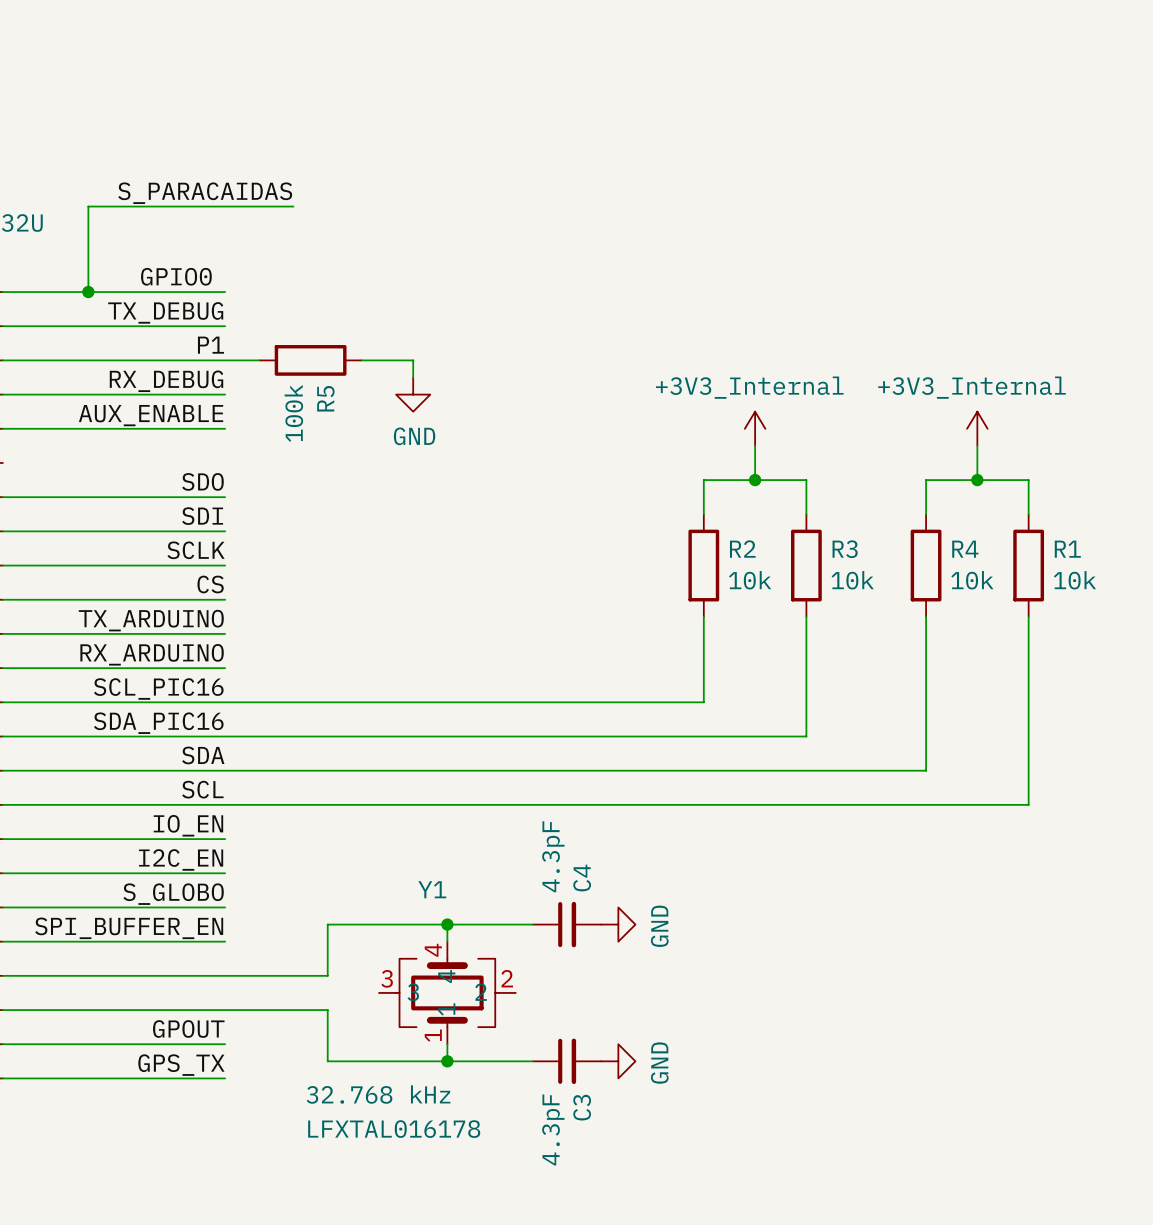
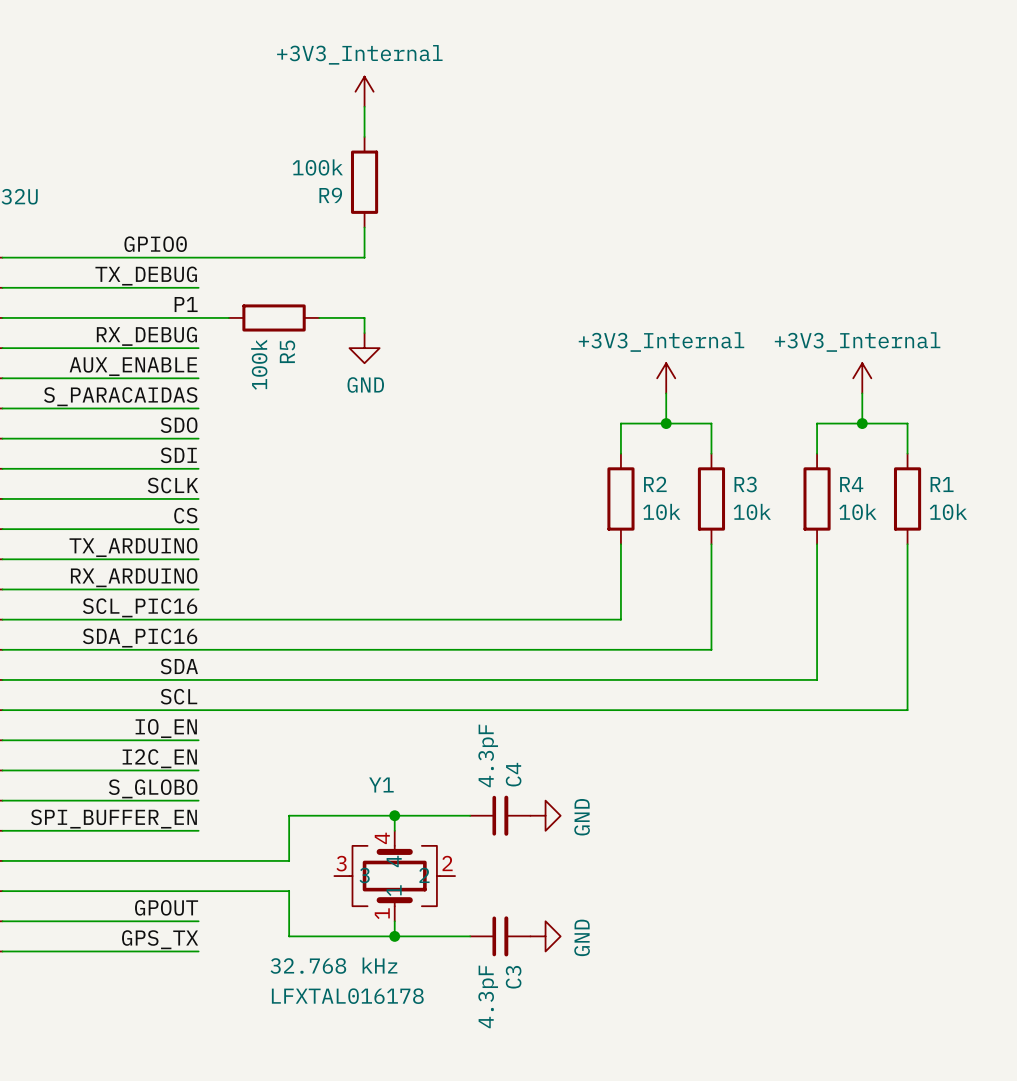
power symbol: none -> +3V3_Internal (364, 91)
wire: none -> (364, 106) (364, 136)
label position: S_PARACAIDAS (205, 193) -> S_PARACAIDAS (120, 396)
wire: (293, 206) (88, 206) (88, 292) -> none
R9: none -> 100k (364, 182)
wire: none -> (364, 227) (364, 257) (198, 257)
junction: (88, 292) -> none
wire: none -> (2, 408) (198, 408)

